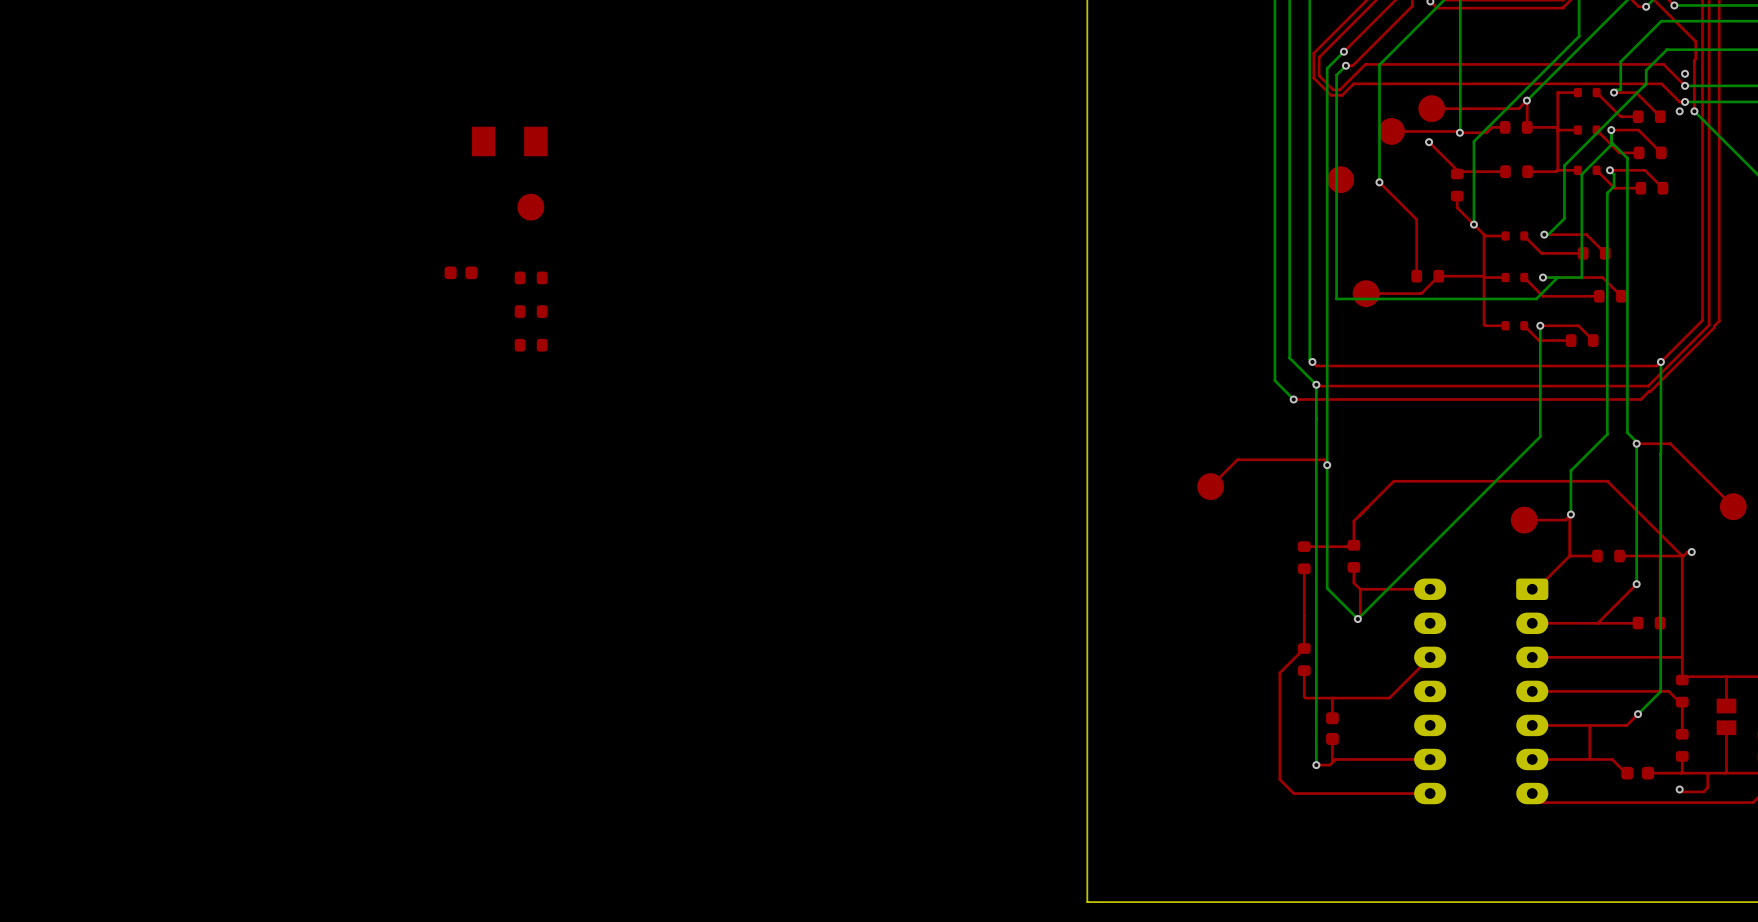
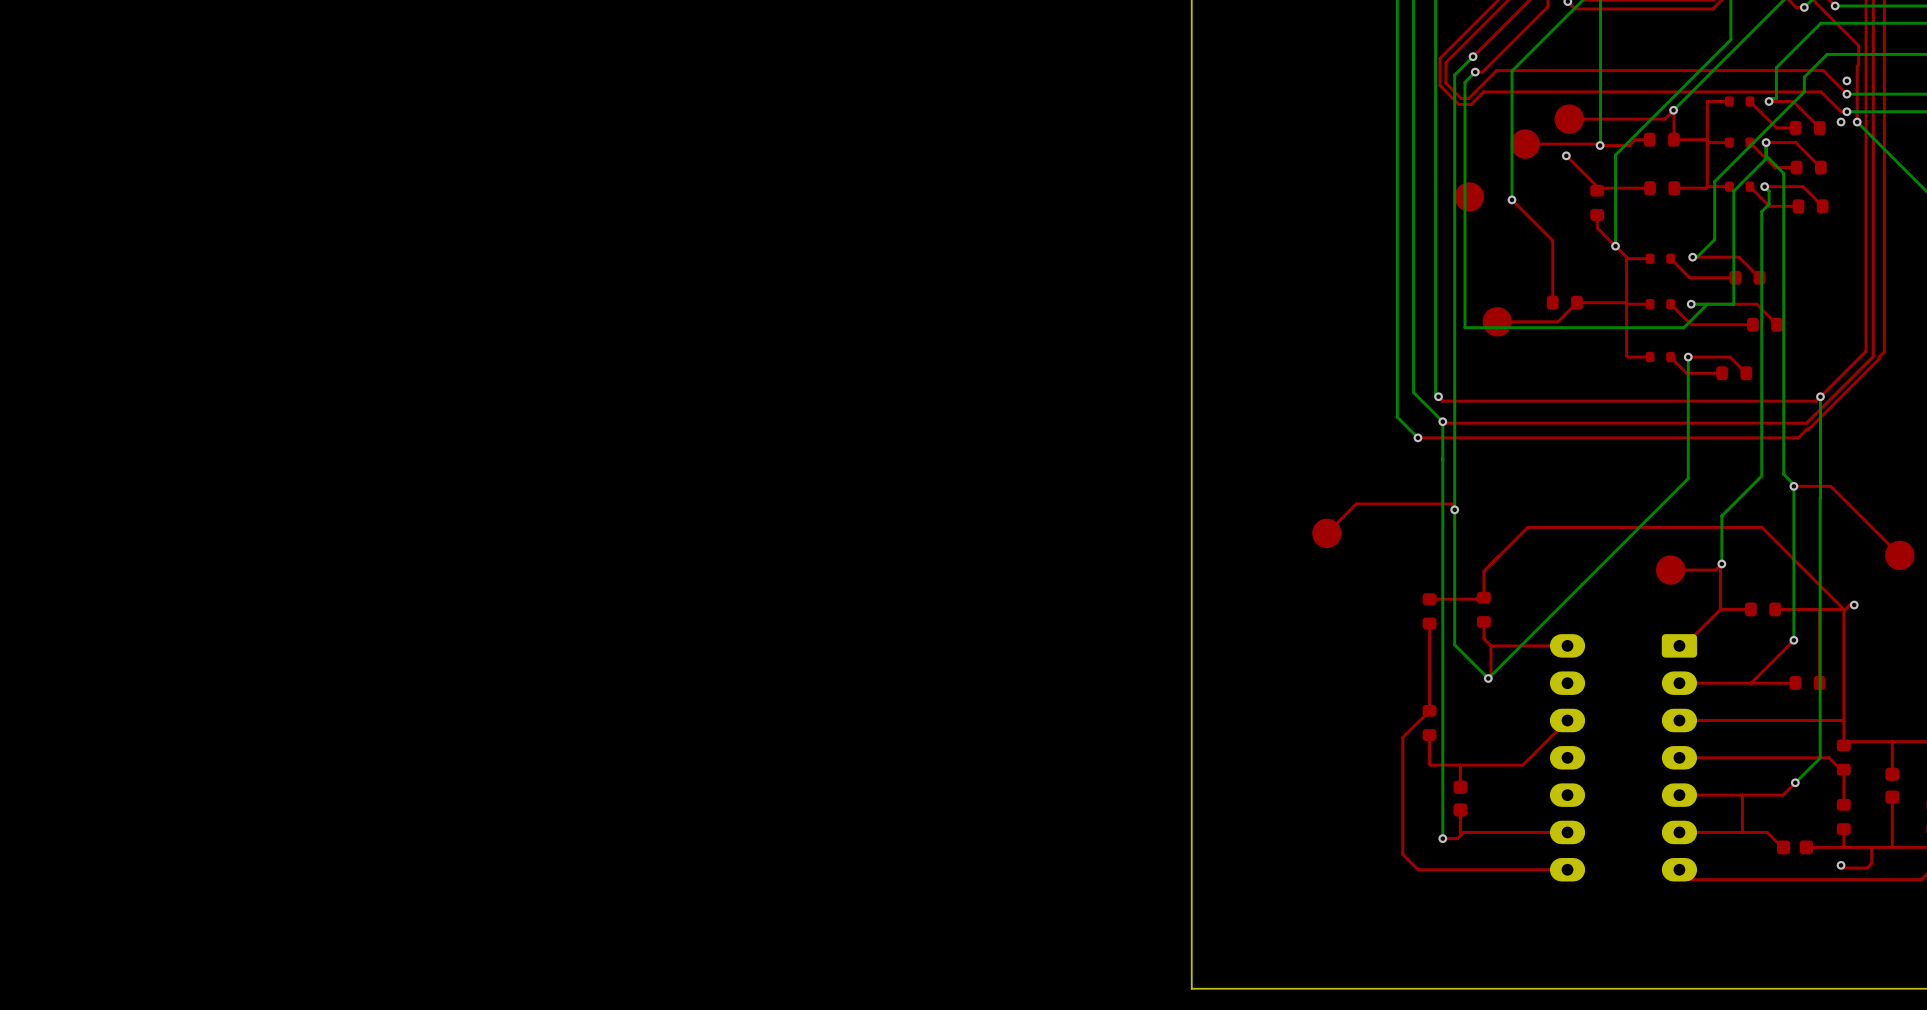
part: (509, 141) -> none
part: (530, 207) -> none
part: (461, 272) -> none
part: (531, 277) -> none
part: (531, 311) -> none
part: (531, 345) -> none
part footprint: [1716, 698, 1737, 736] -> [1885, 767, 1900, 804]

